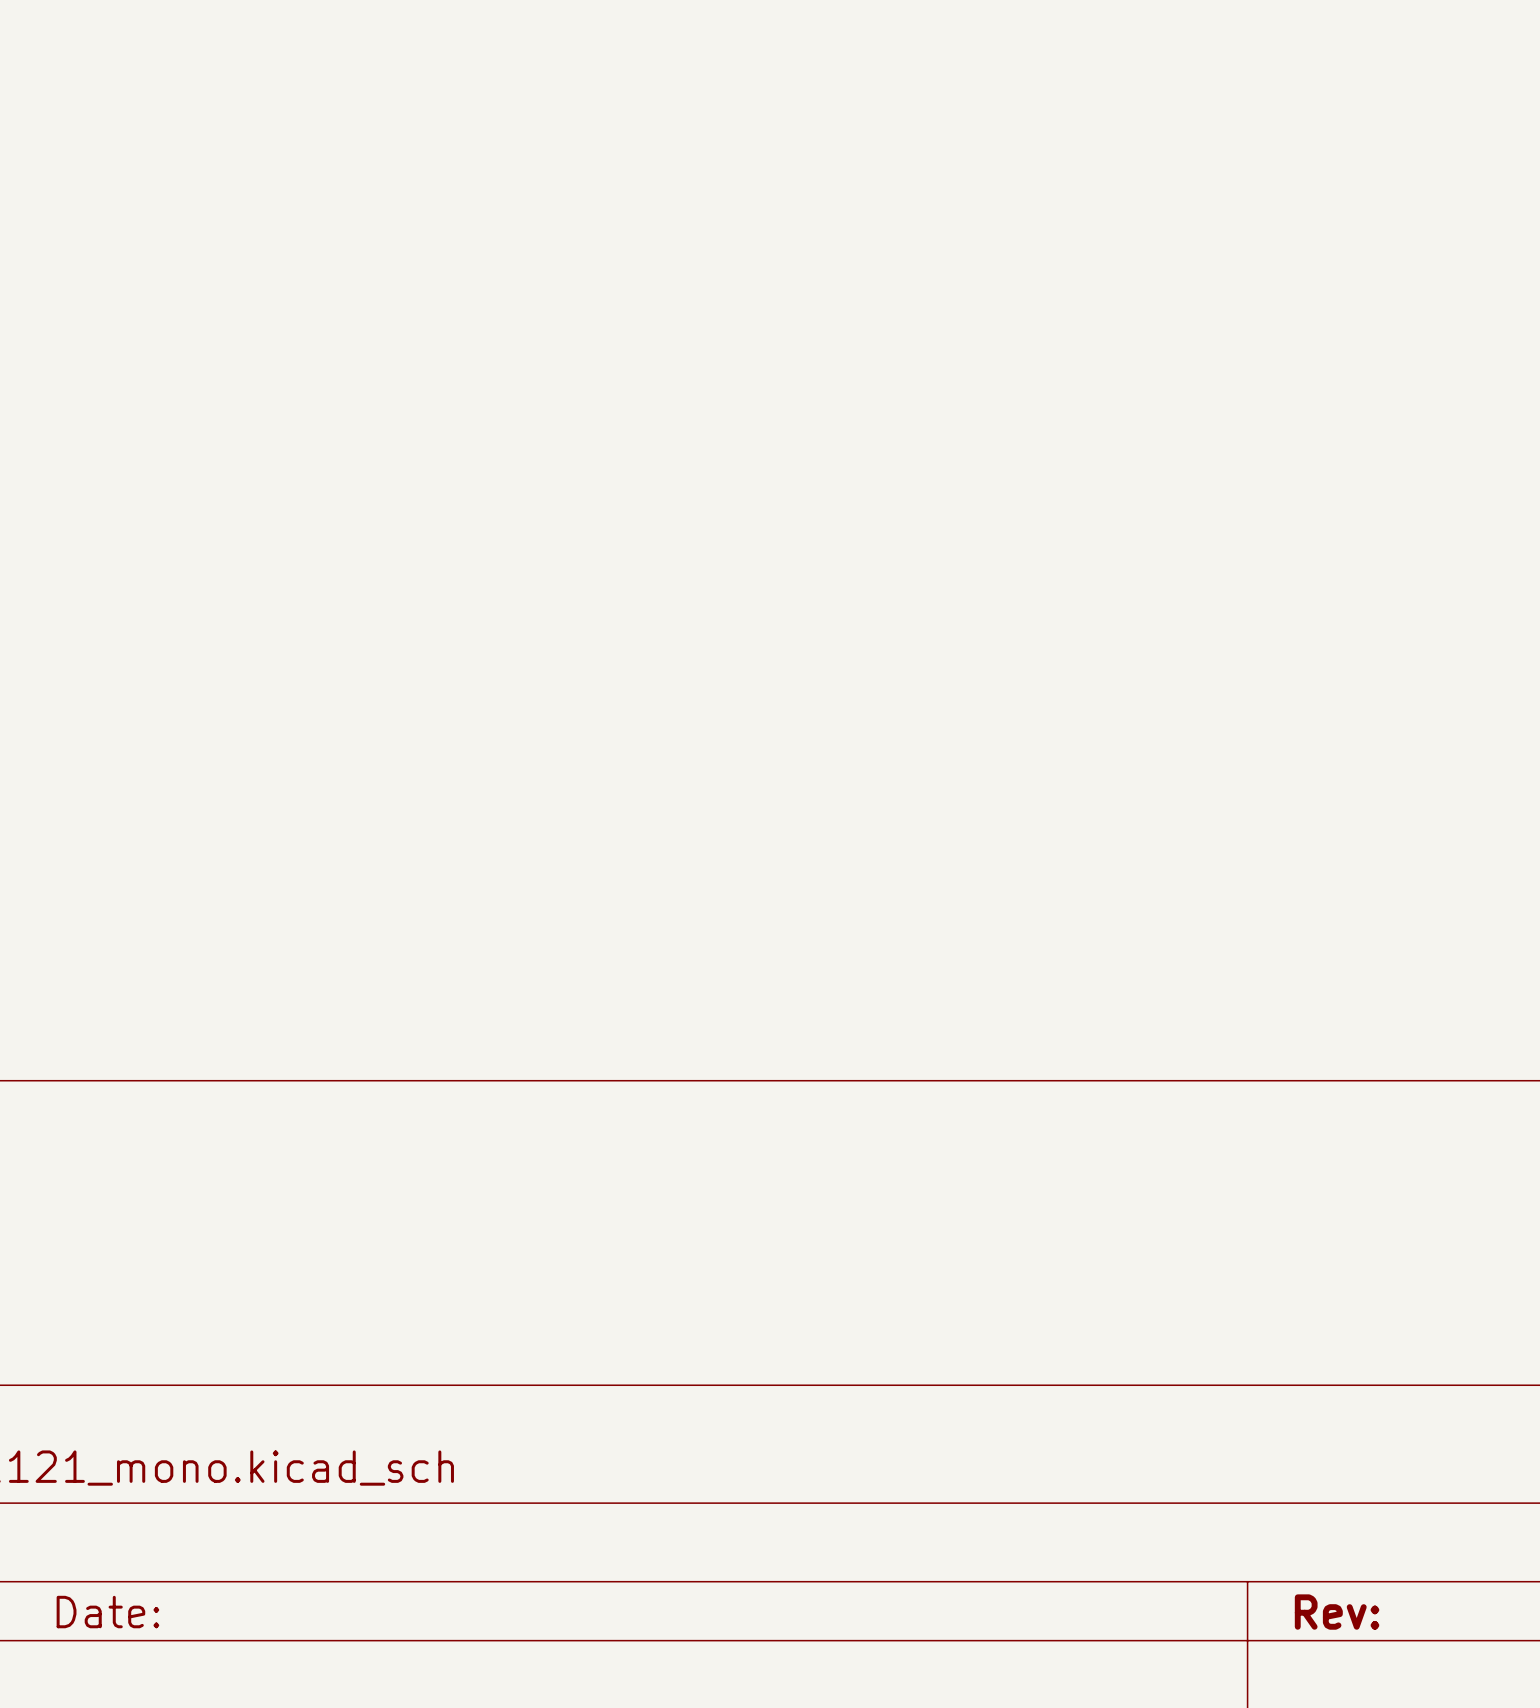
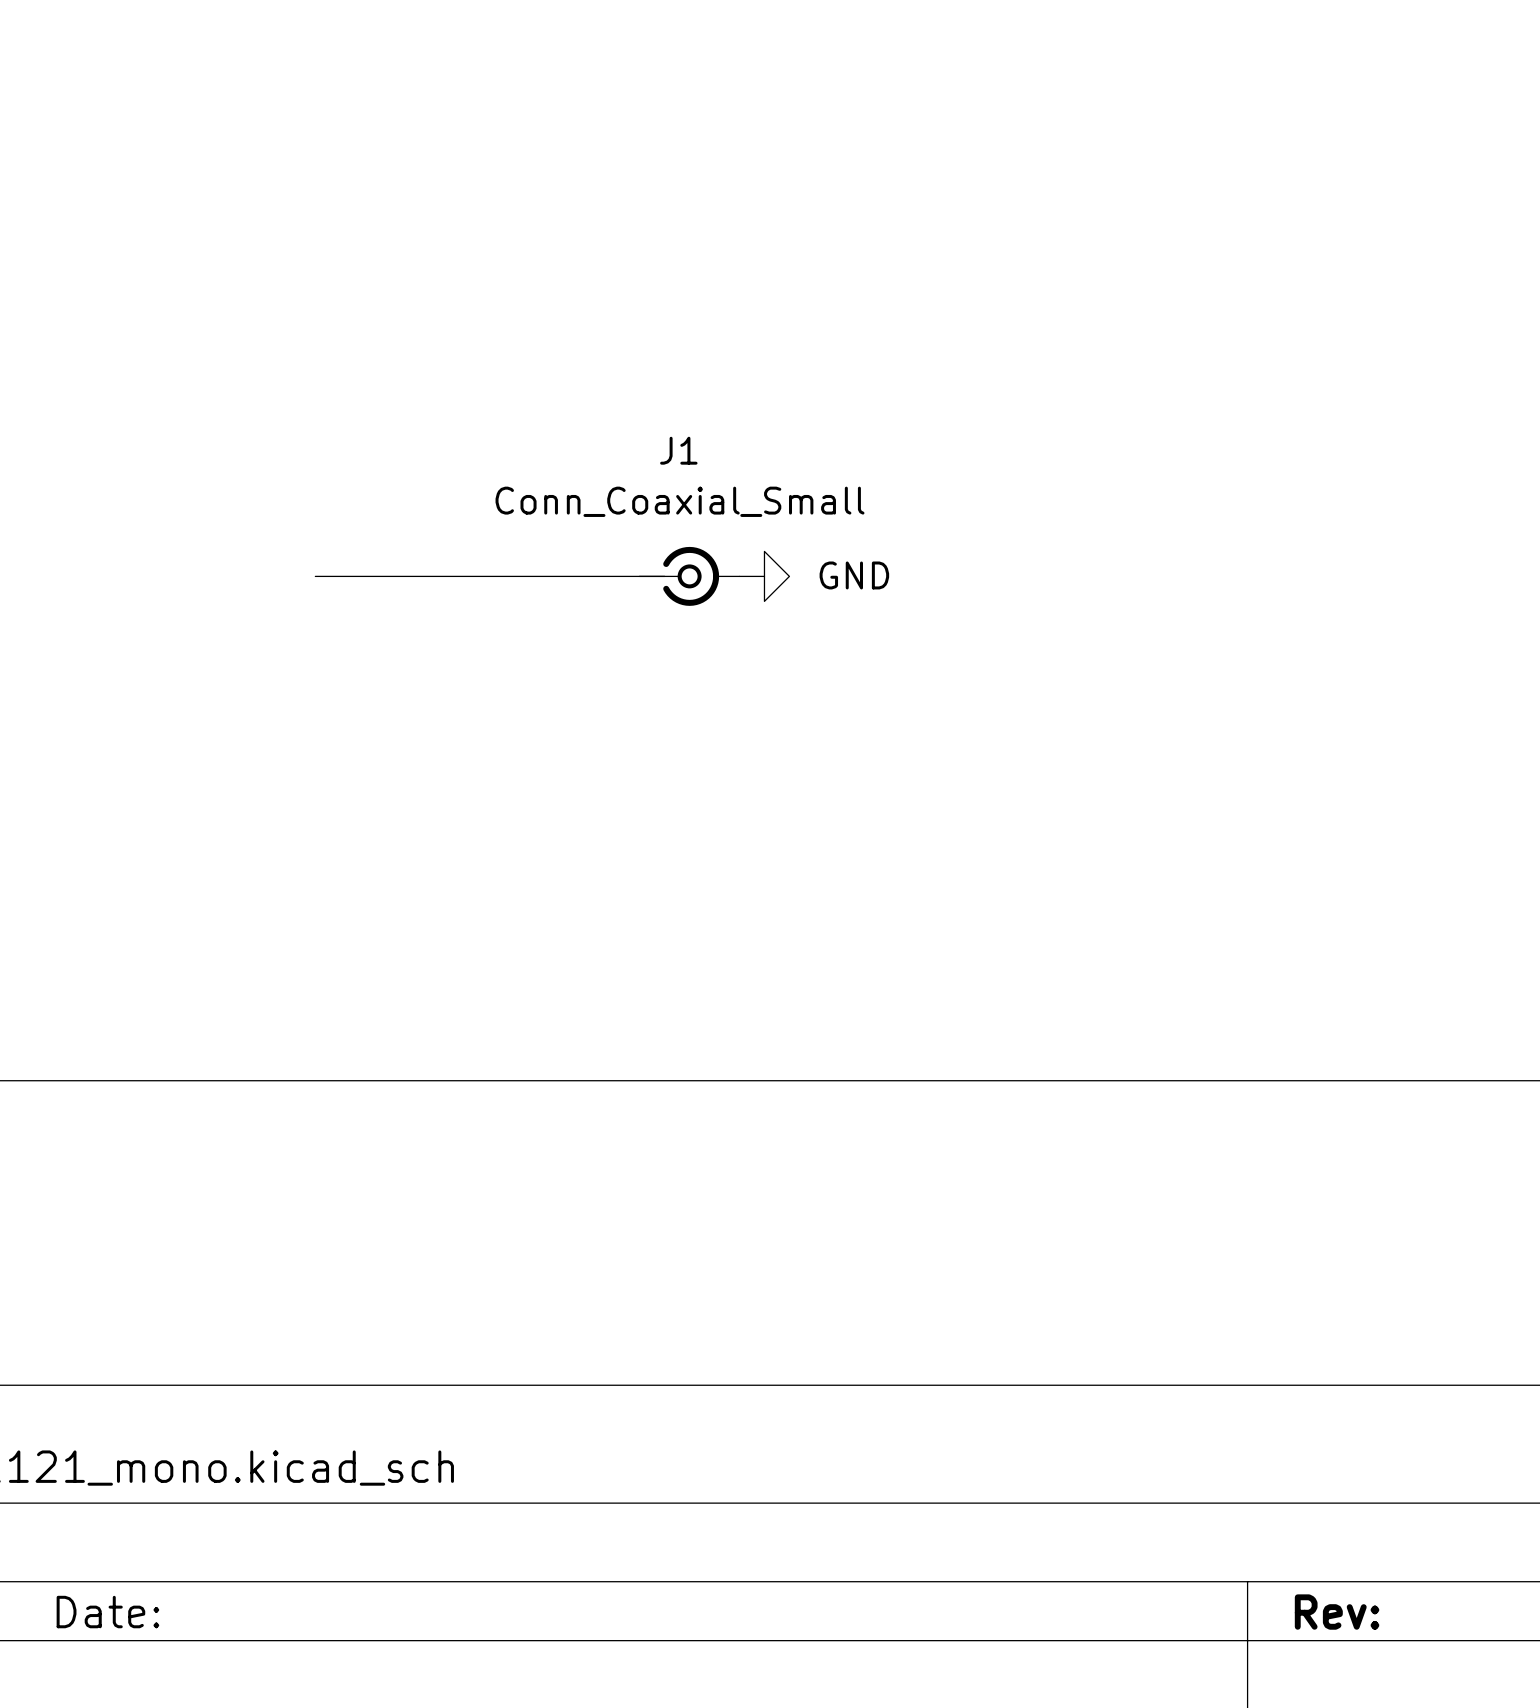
wire: none -> (315, 576) (639, 576)
J1: none -> Conn_Coaxial_Small (689, 576)
power symbol: none -> GND (764, 576)

